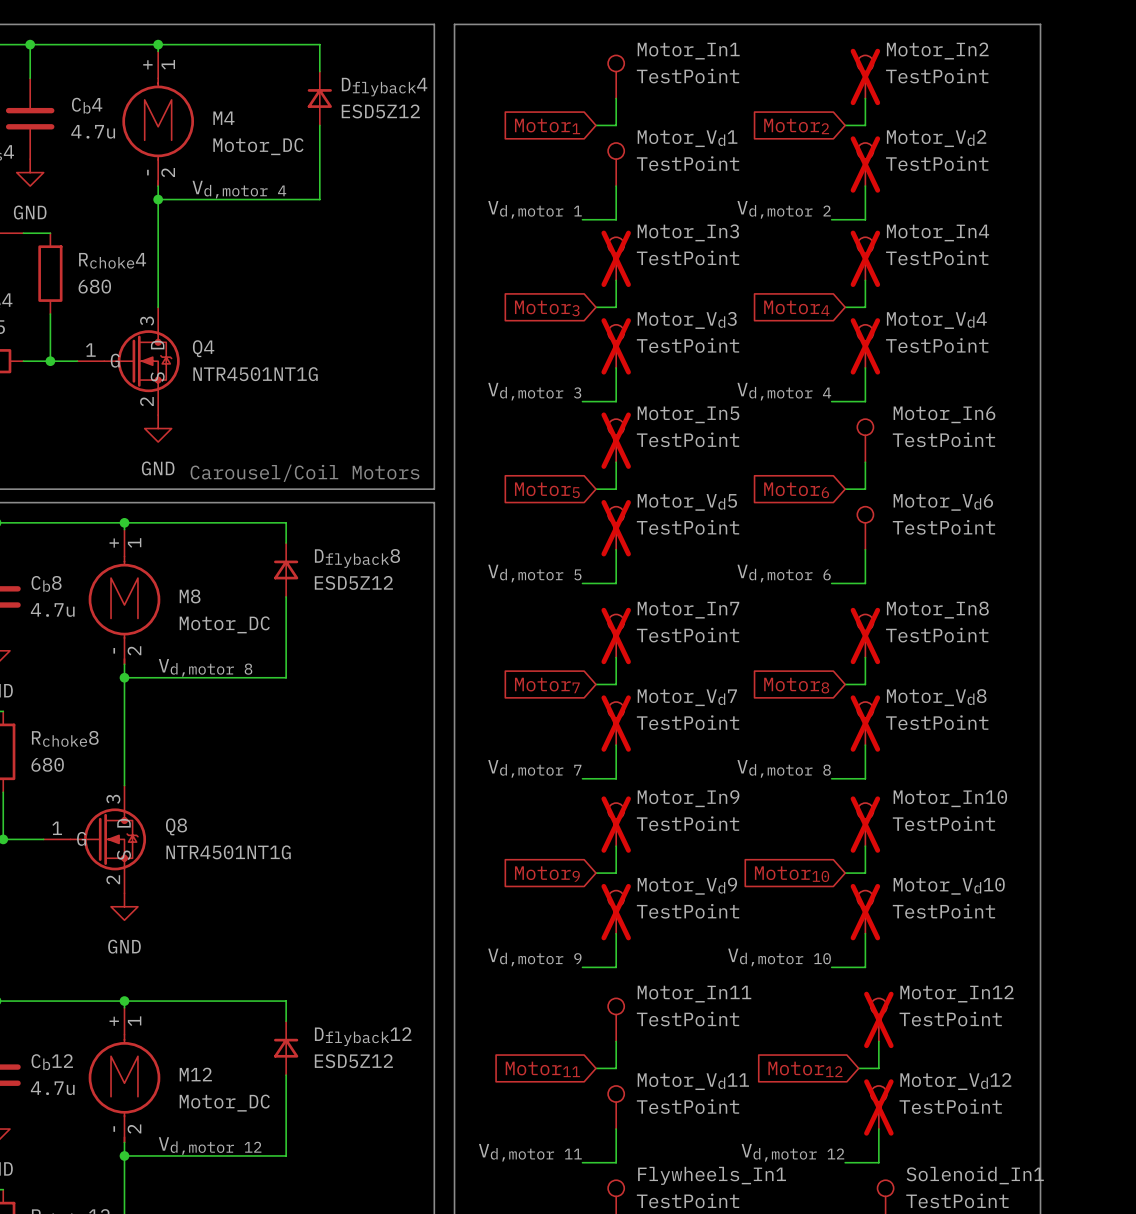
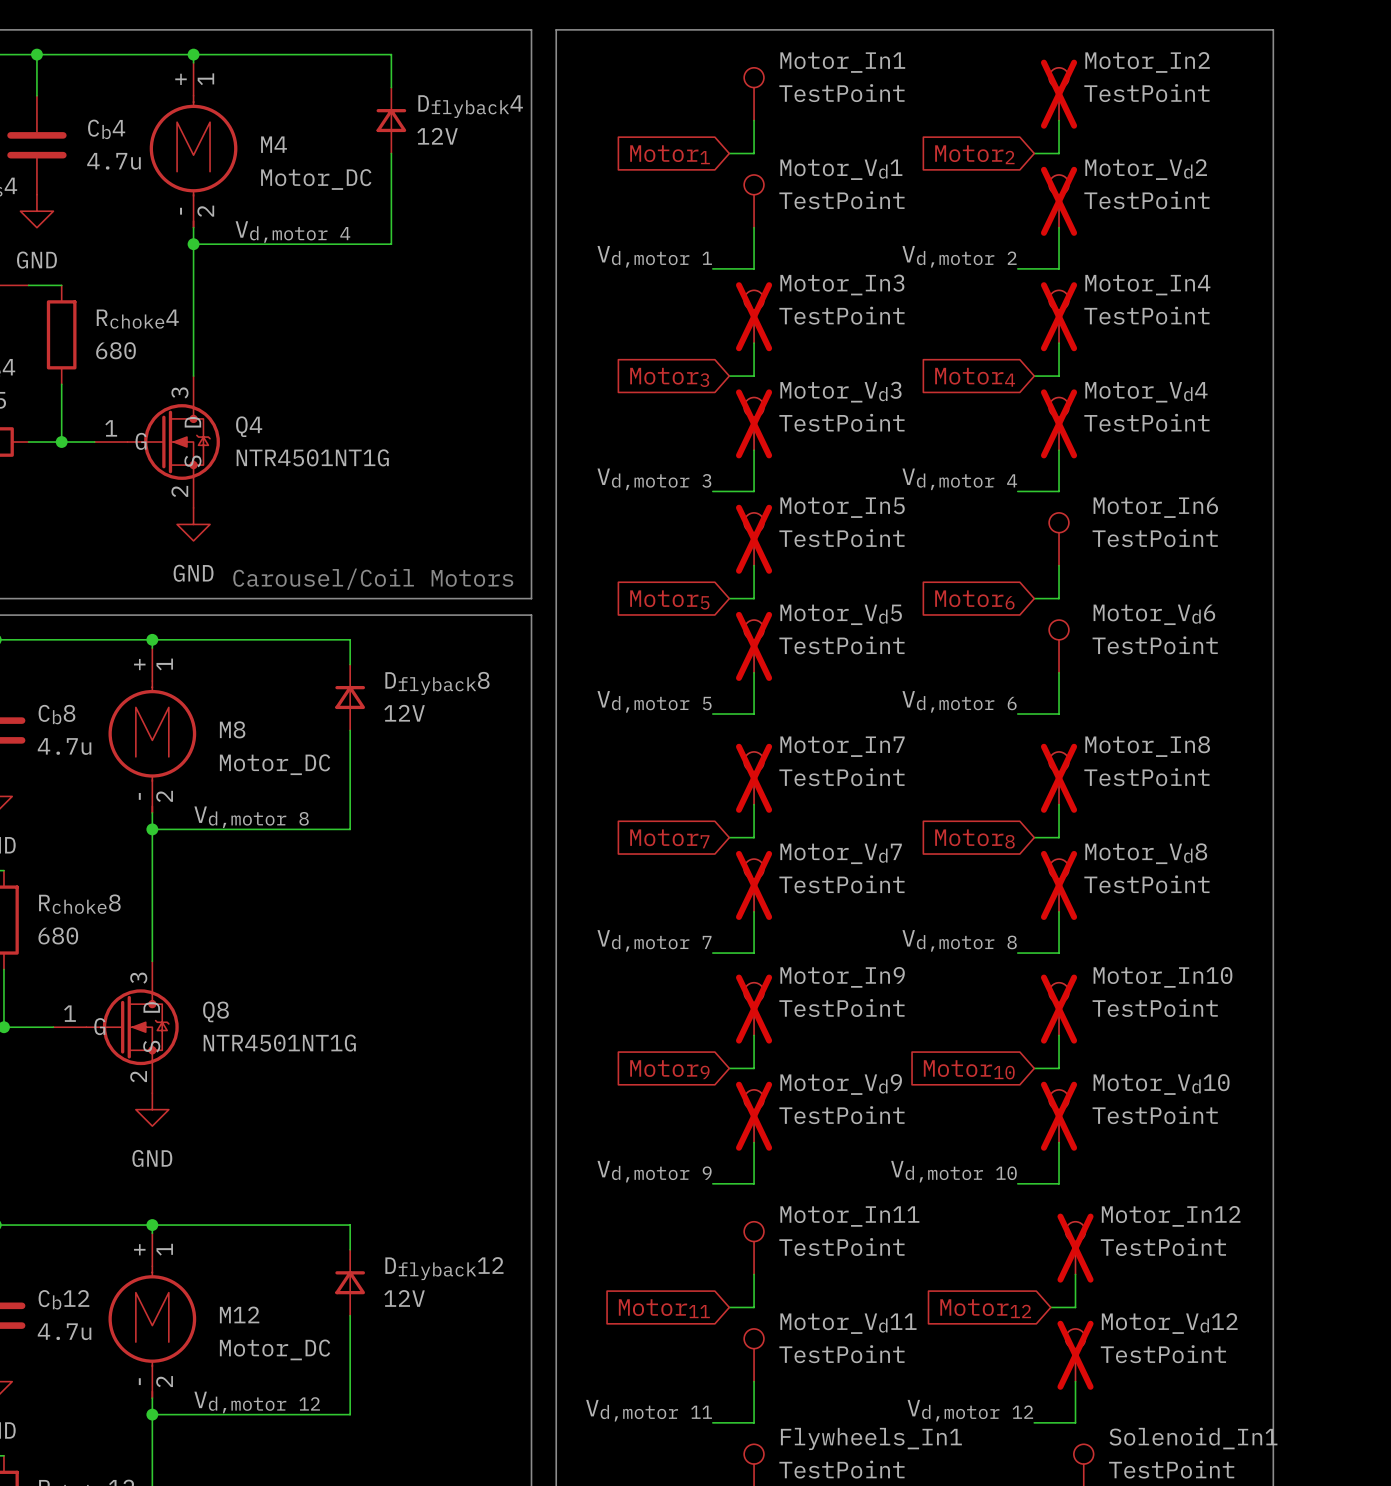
Dflyback4 value: ESD5Z12 (380, 111) -> 12V (437, 136)
Dflyback8 value: ESD5Z12 (353, 582) -> 12V (404, 713)
Dflyback12 value: ESD5Z12 (353, 1061) -> 12V (404, 1298)

